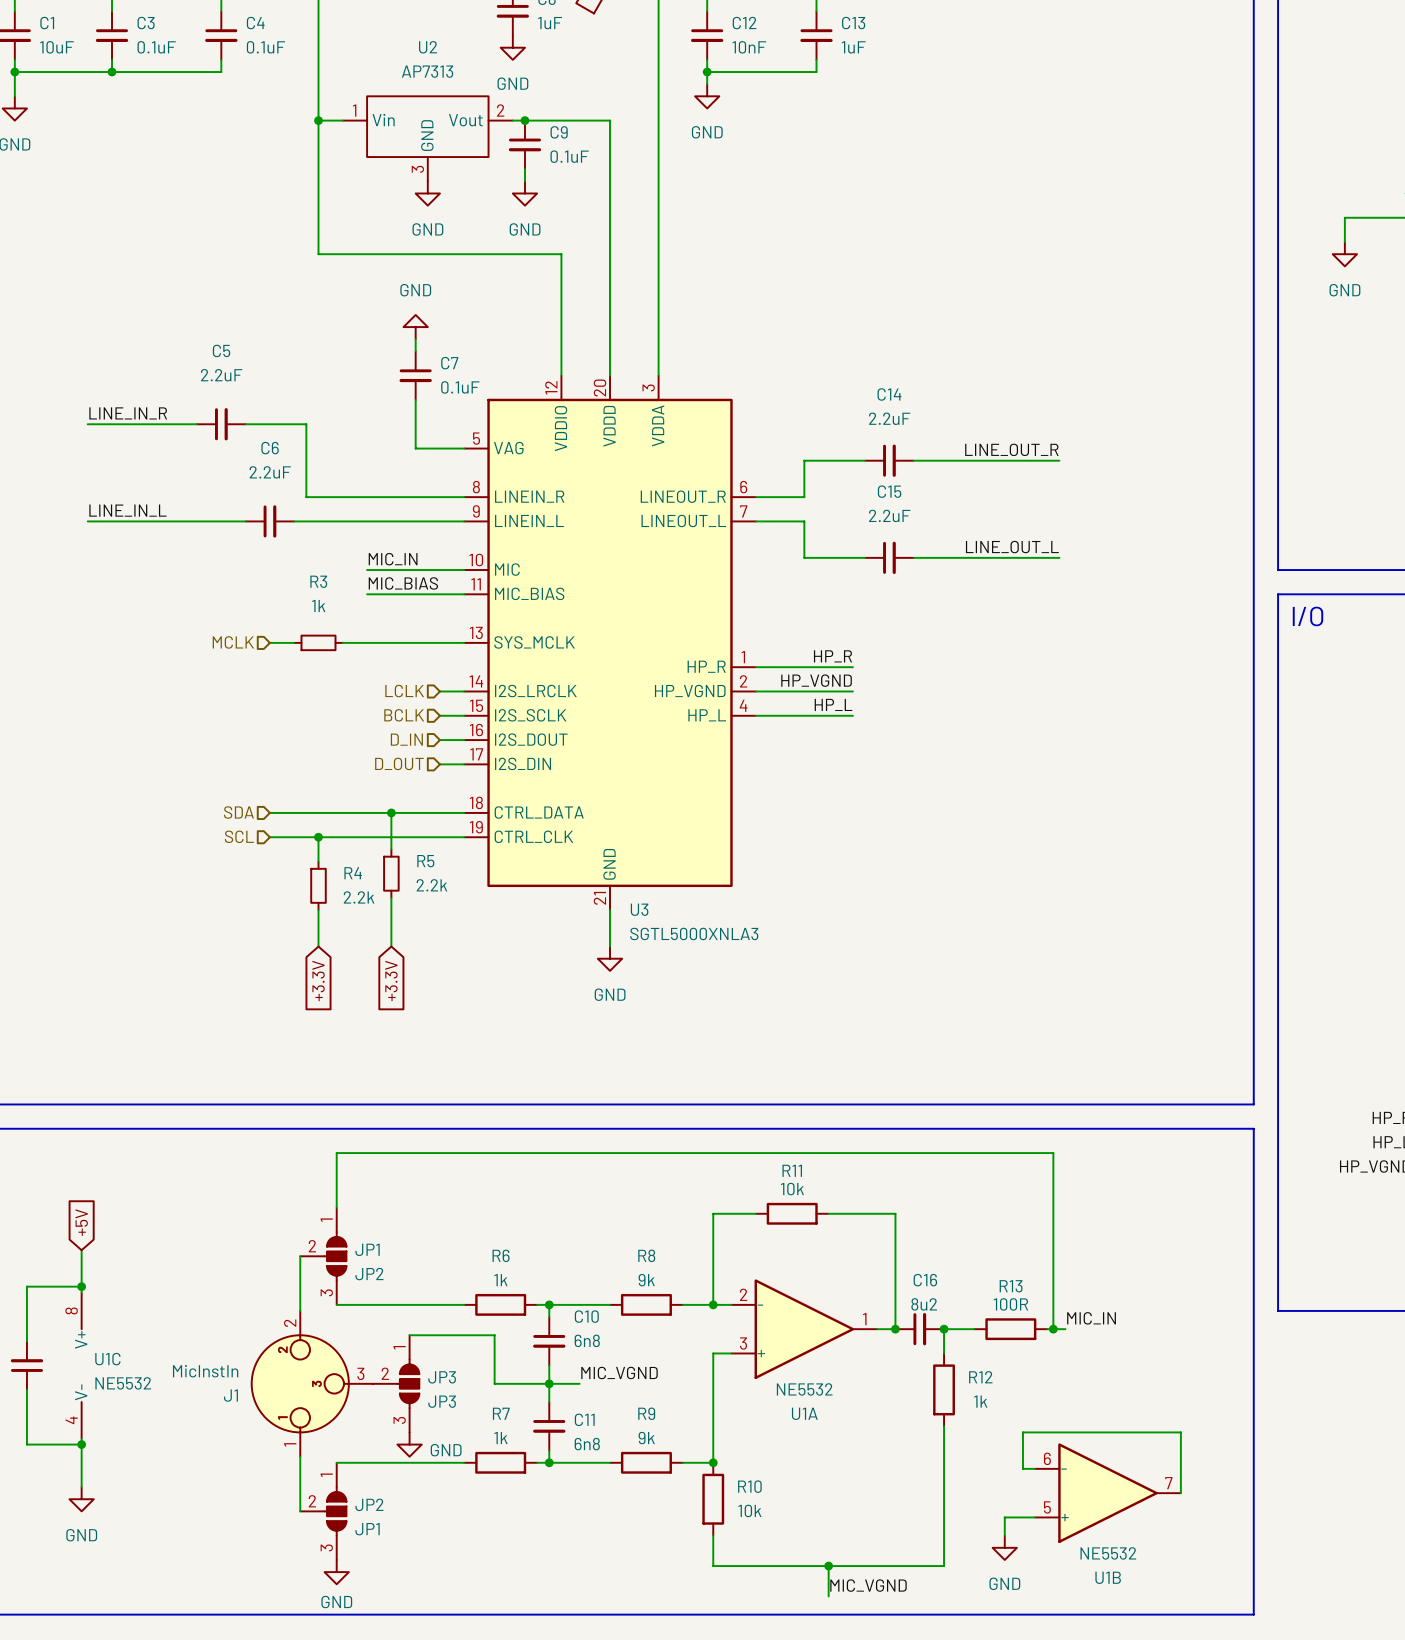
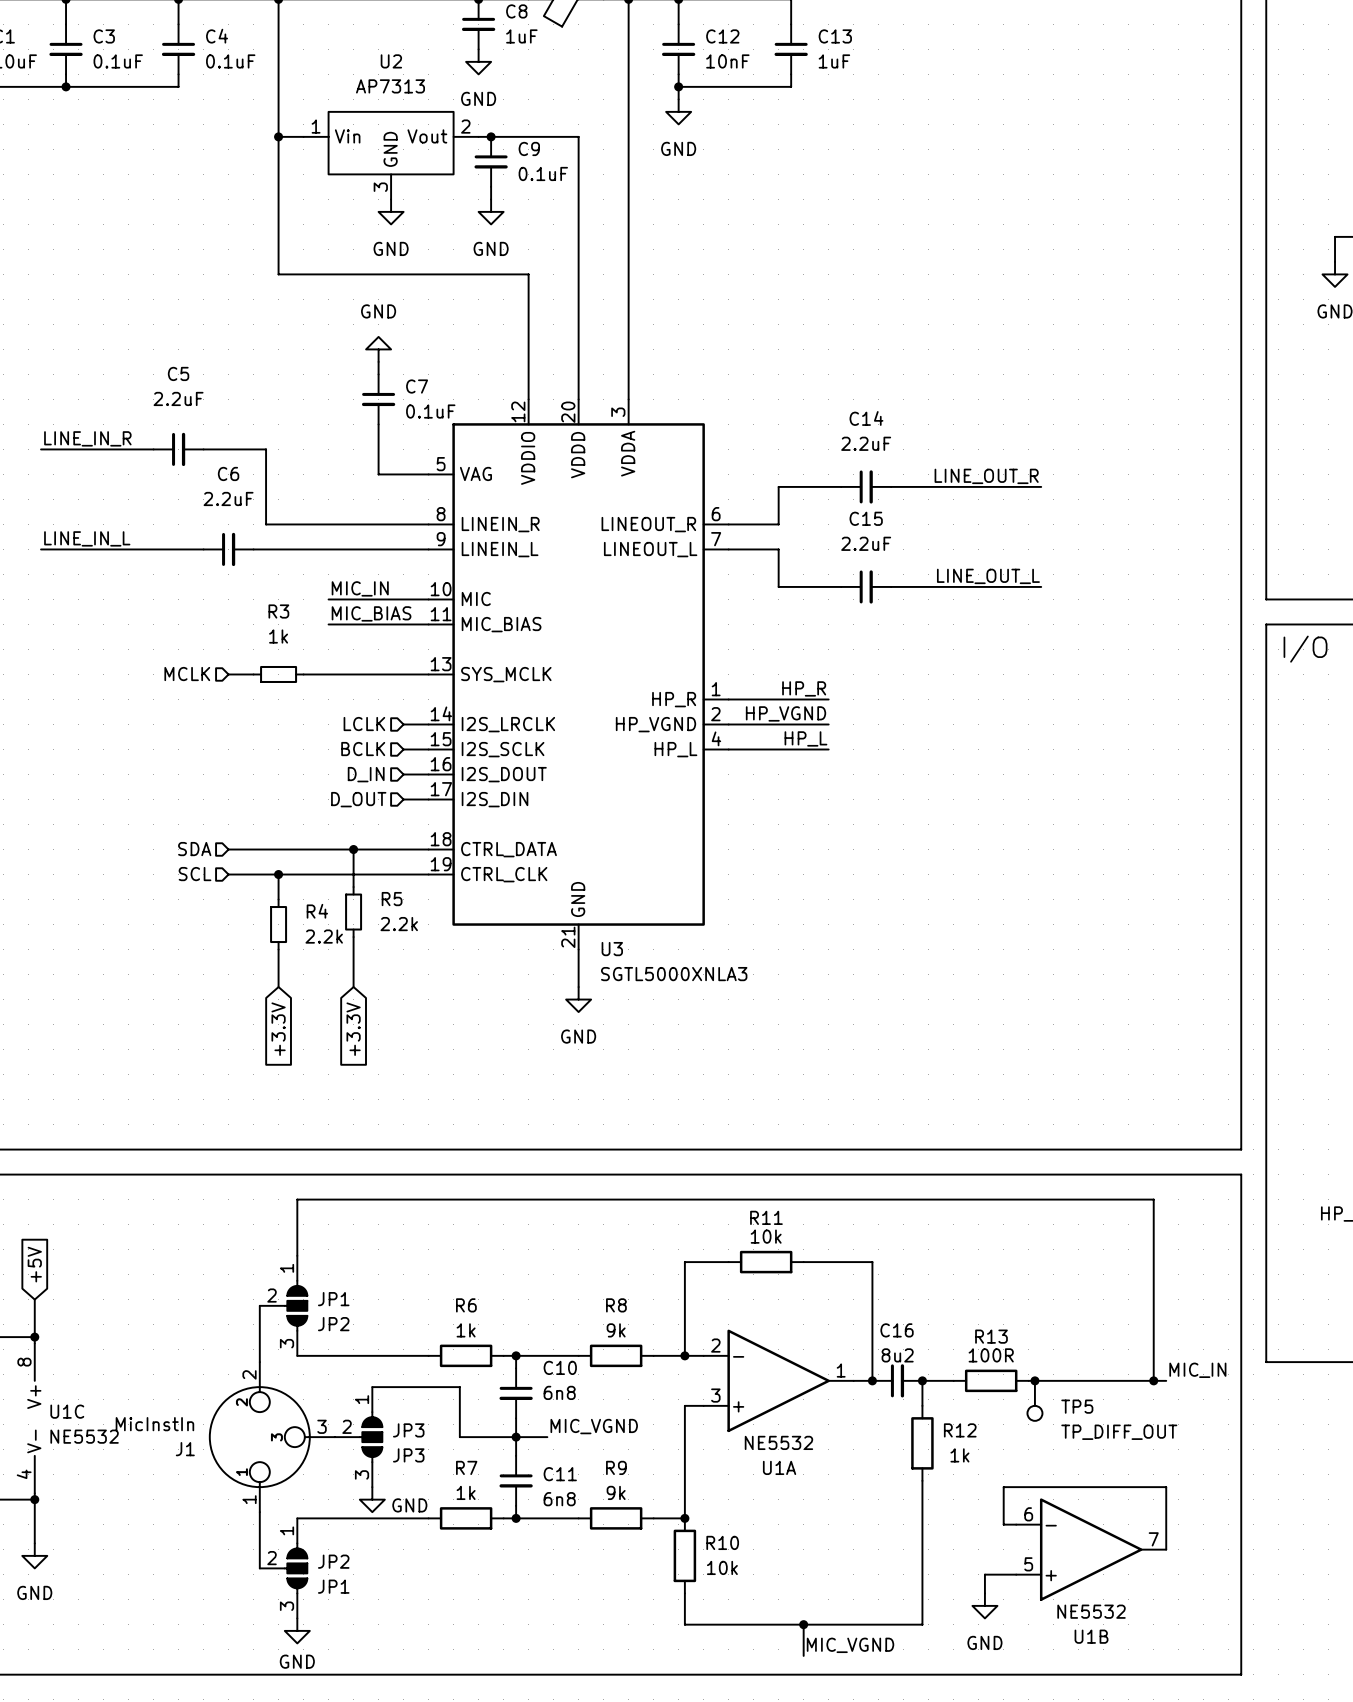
wire: (1053, 1153) (1053, 1329) -> (1034, 1199) (1153, 1199) (1153, 1380)
label position: MIC_IN (1091, 1318) -> MIC_IN (1197, 1370)
wire: none -> (1047, 1380) (1166, 1380)
junction: none -> (1153, 1380)
TP5: none -> TP_DIFF_OUT (1034, 1400)

